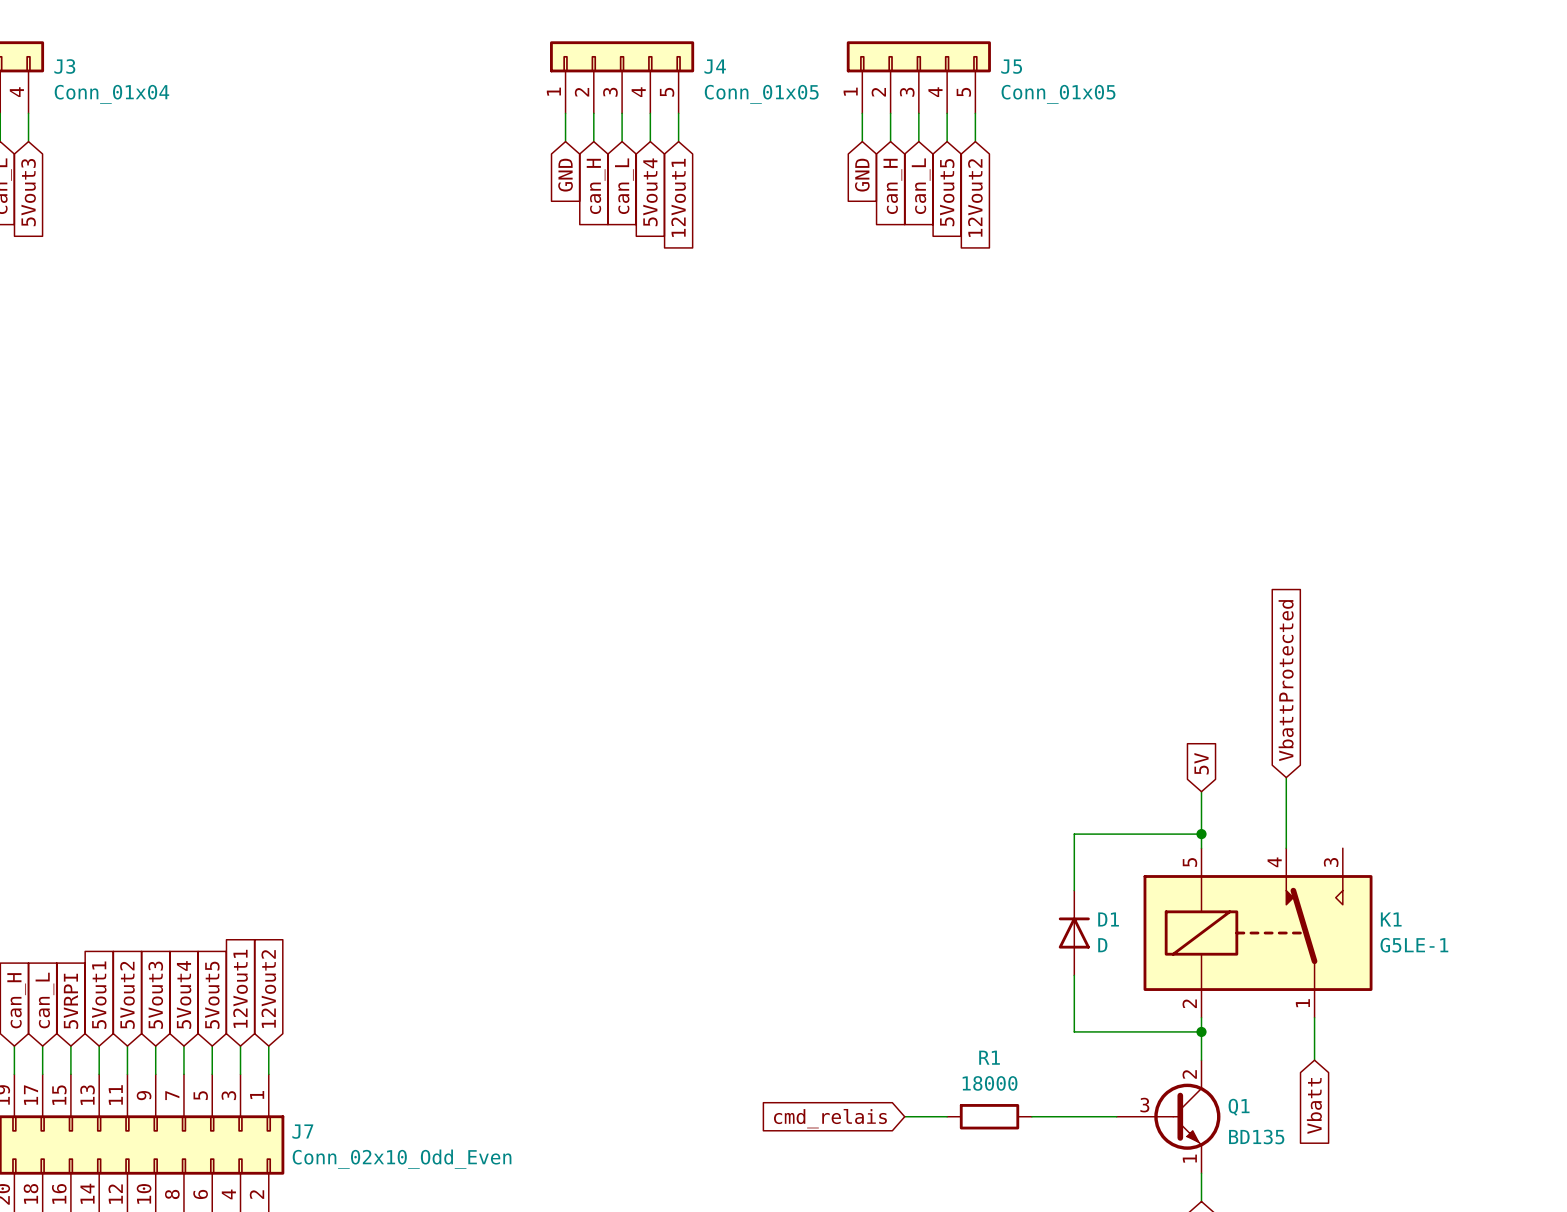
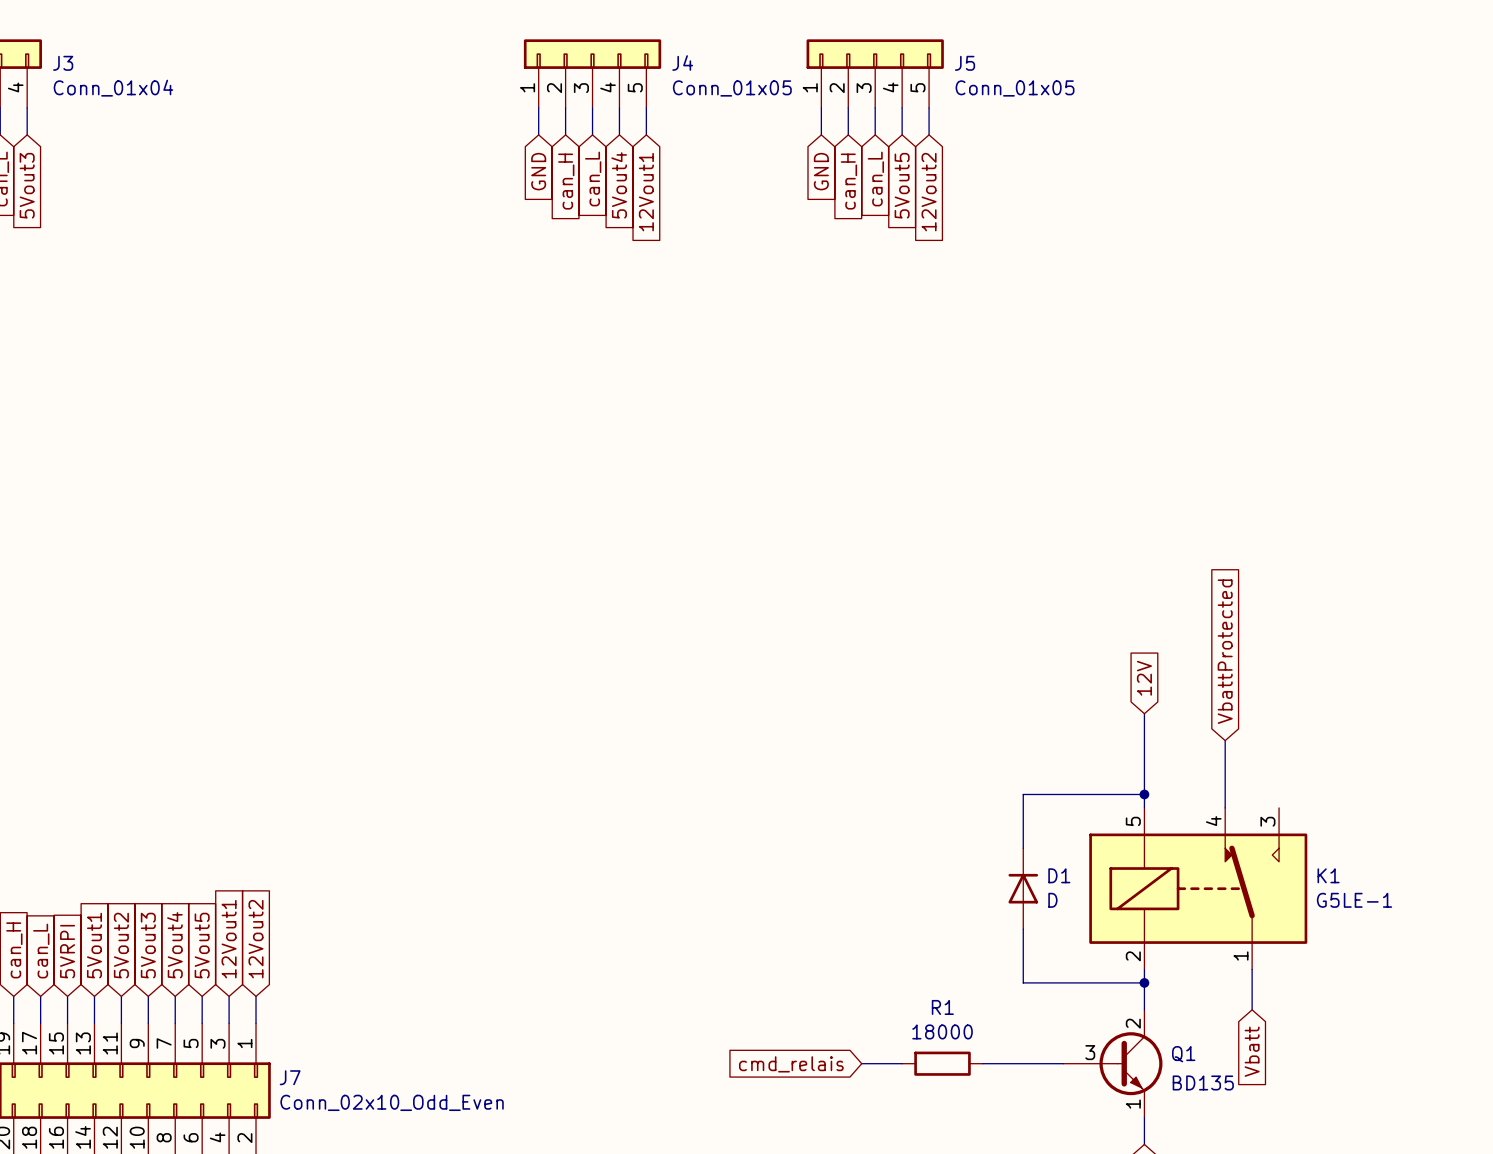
global label: none -> 12V (1144, 678)
wire: none -> (1144, 713) (1144, 754)
global label: 5V (1201, 763) -> none

